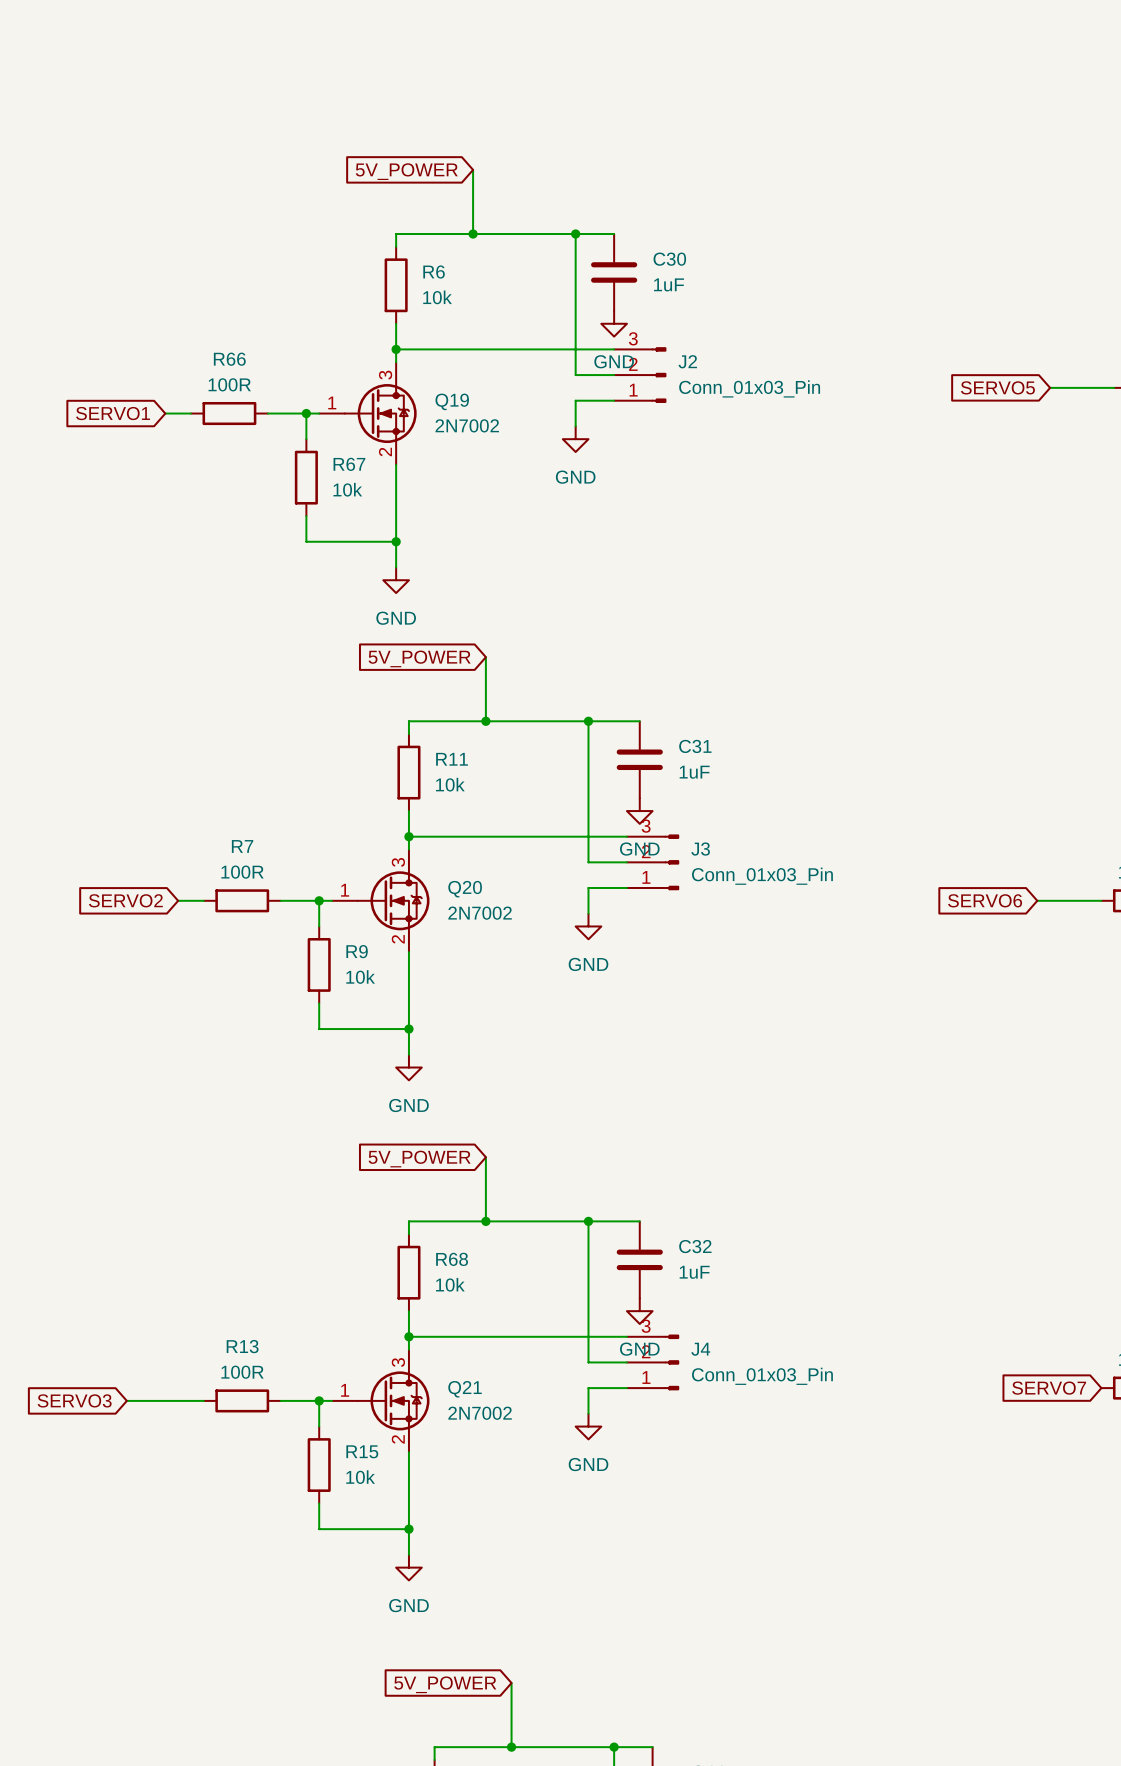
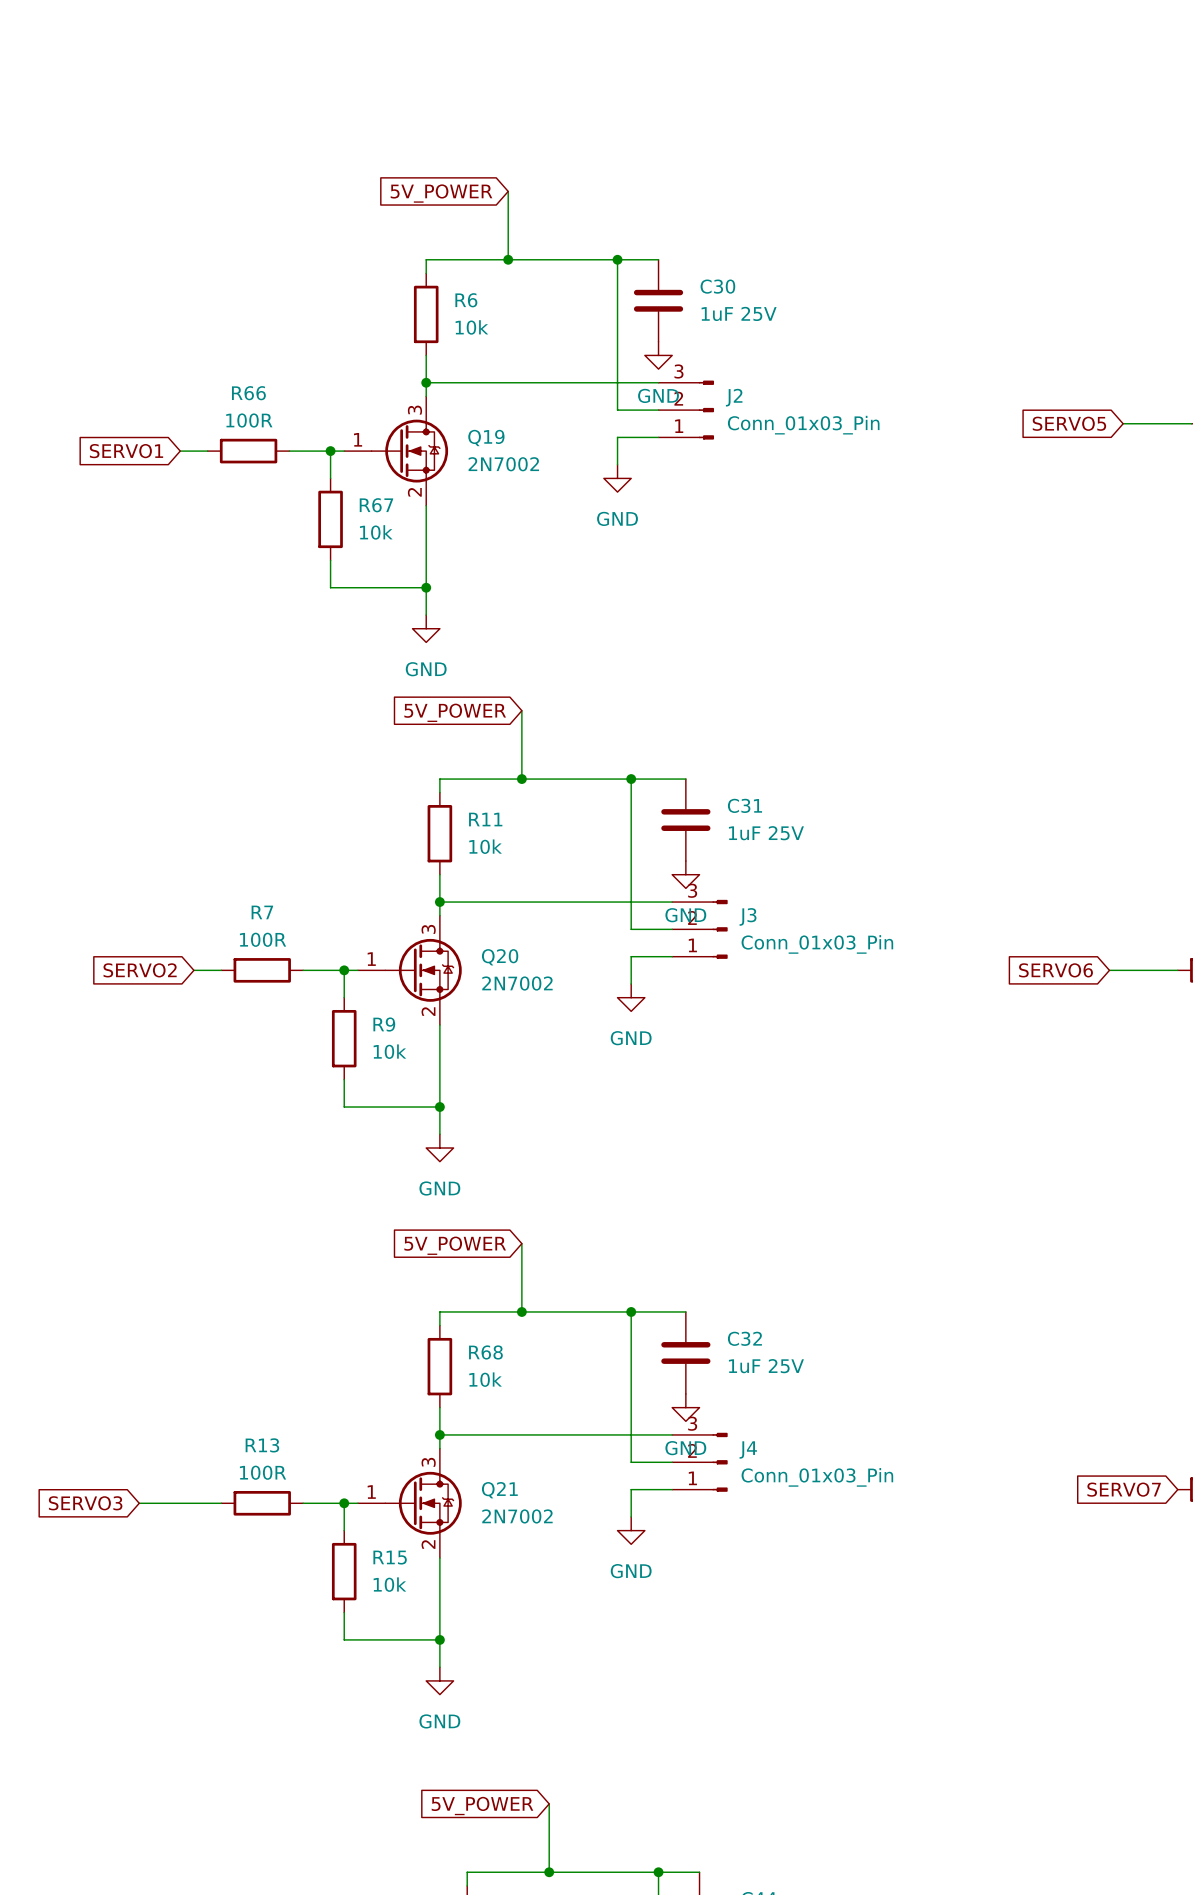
C30 value: 1uF (669, 284) -> 1uF 25V (739, 313)
C31 value: 1uF (694, 772) -> 1uF 25V (766, 833)
C32 value: 1uF (694, 1272) -> 1uF 25V (766, 1366)

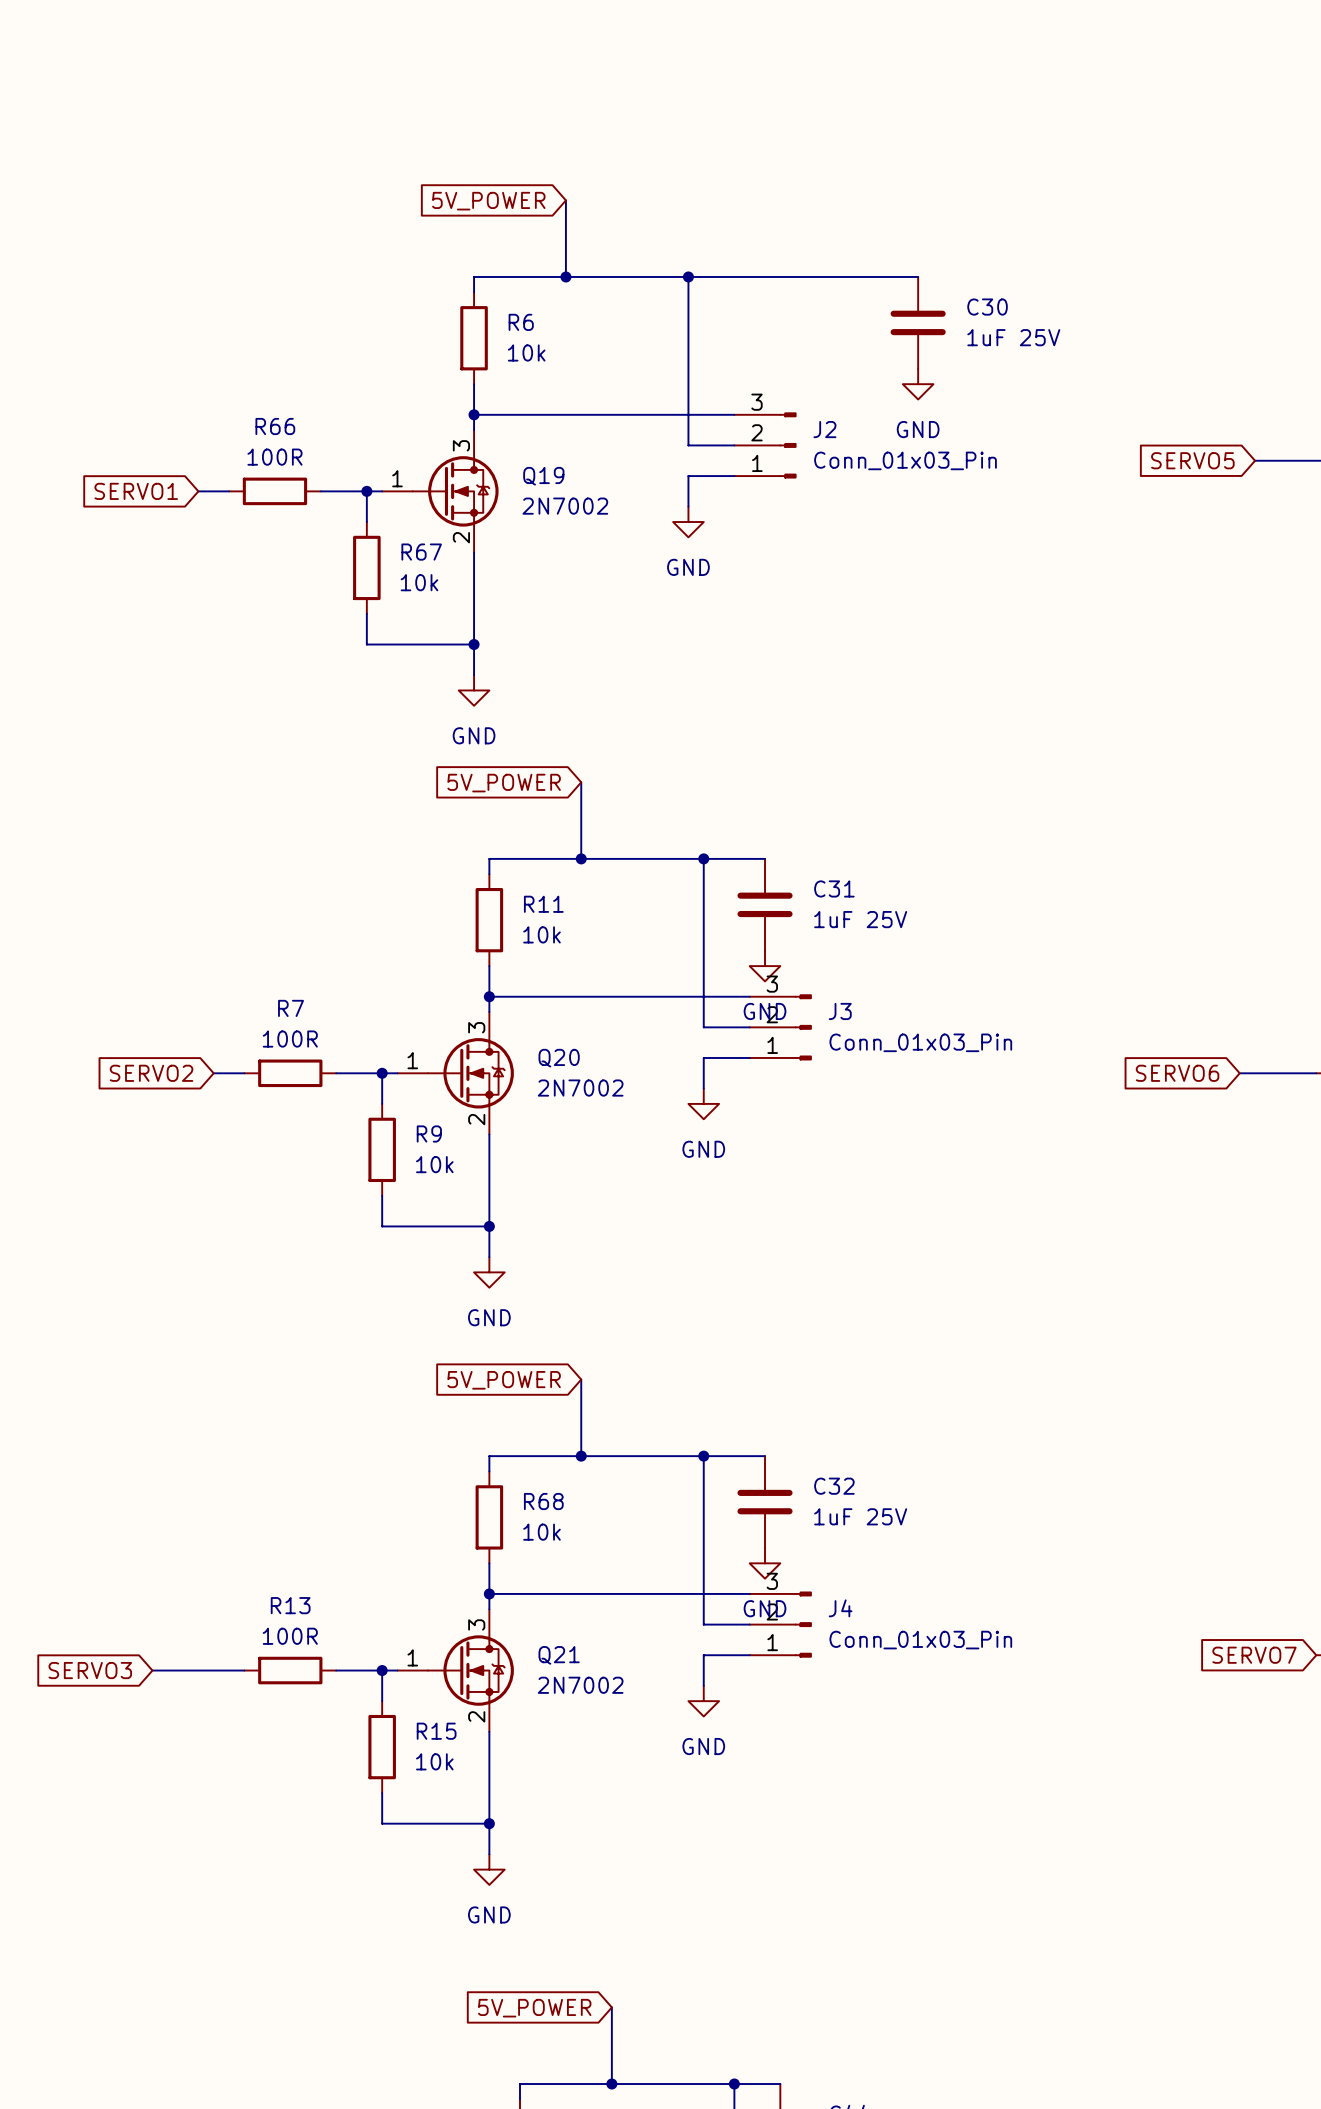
wire: none -> (734, 276) (918, 276)
C30 position: (658, 300) -> (918, 322)
power symbol position: GND (658, 355) -> GND (918, 384)

